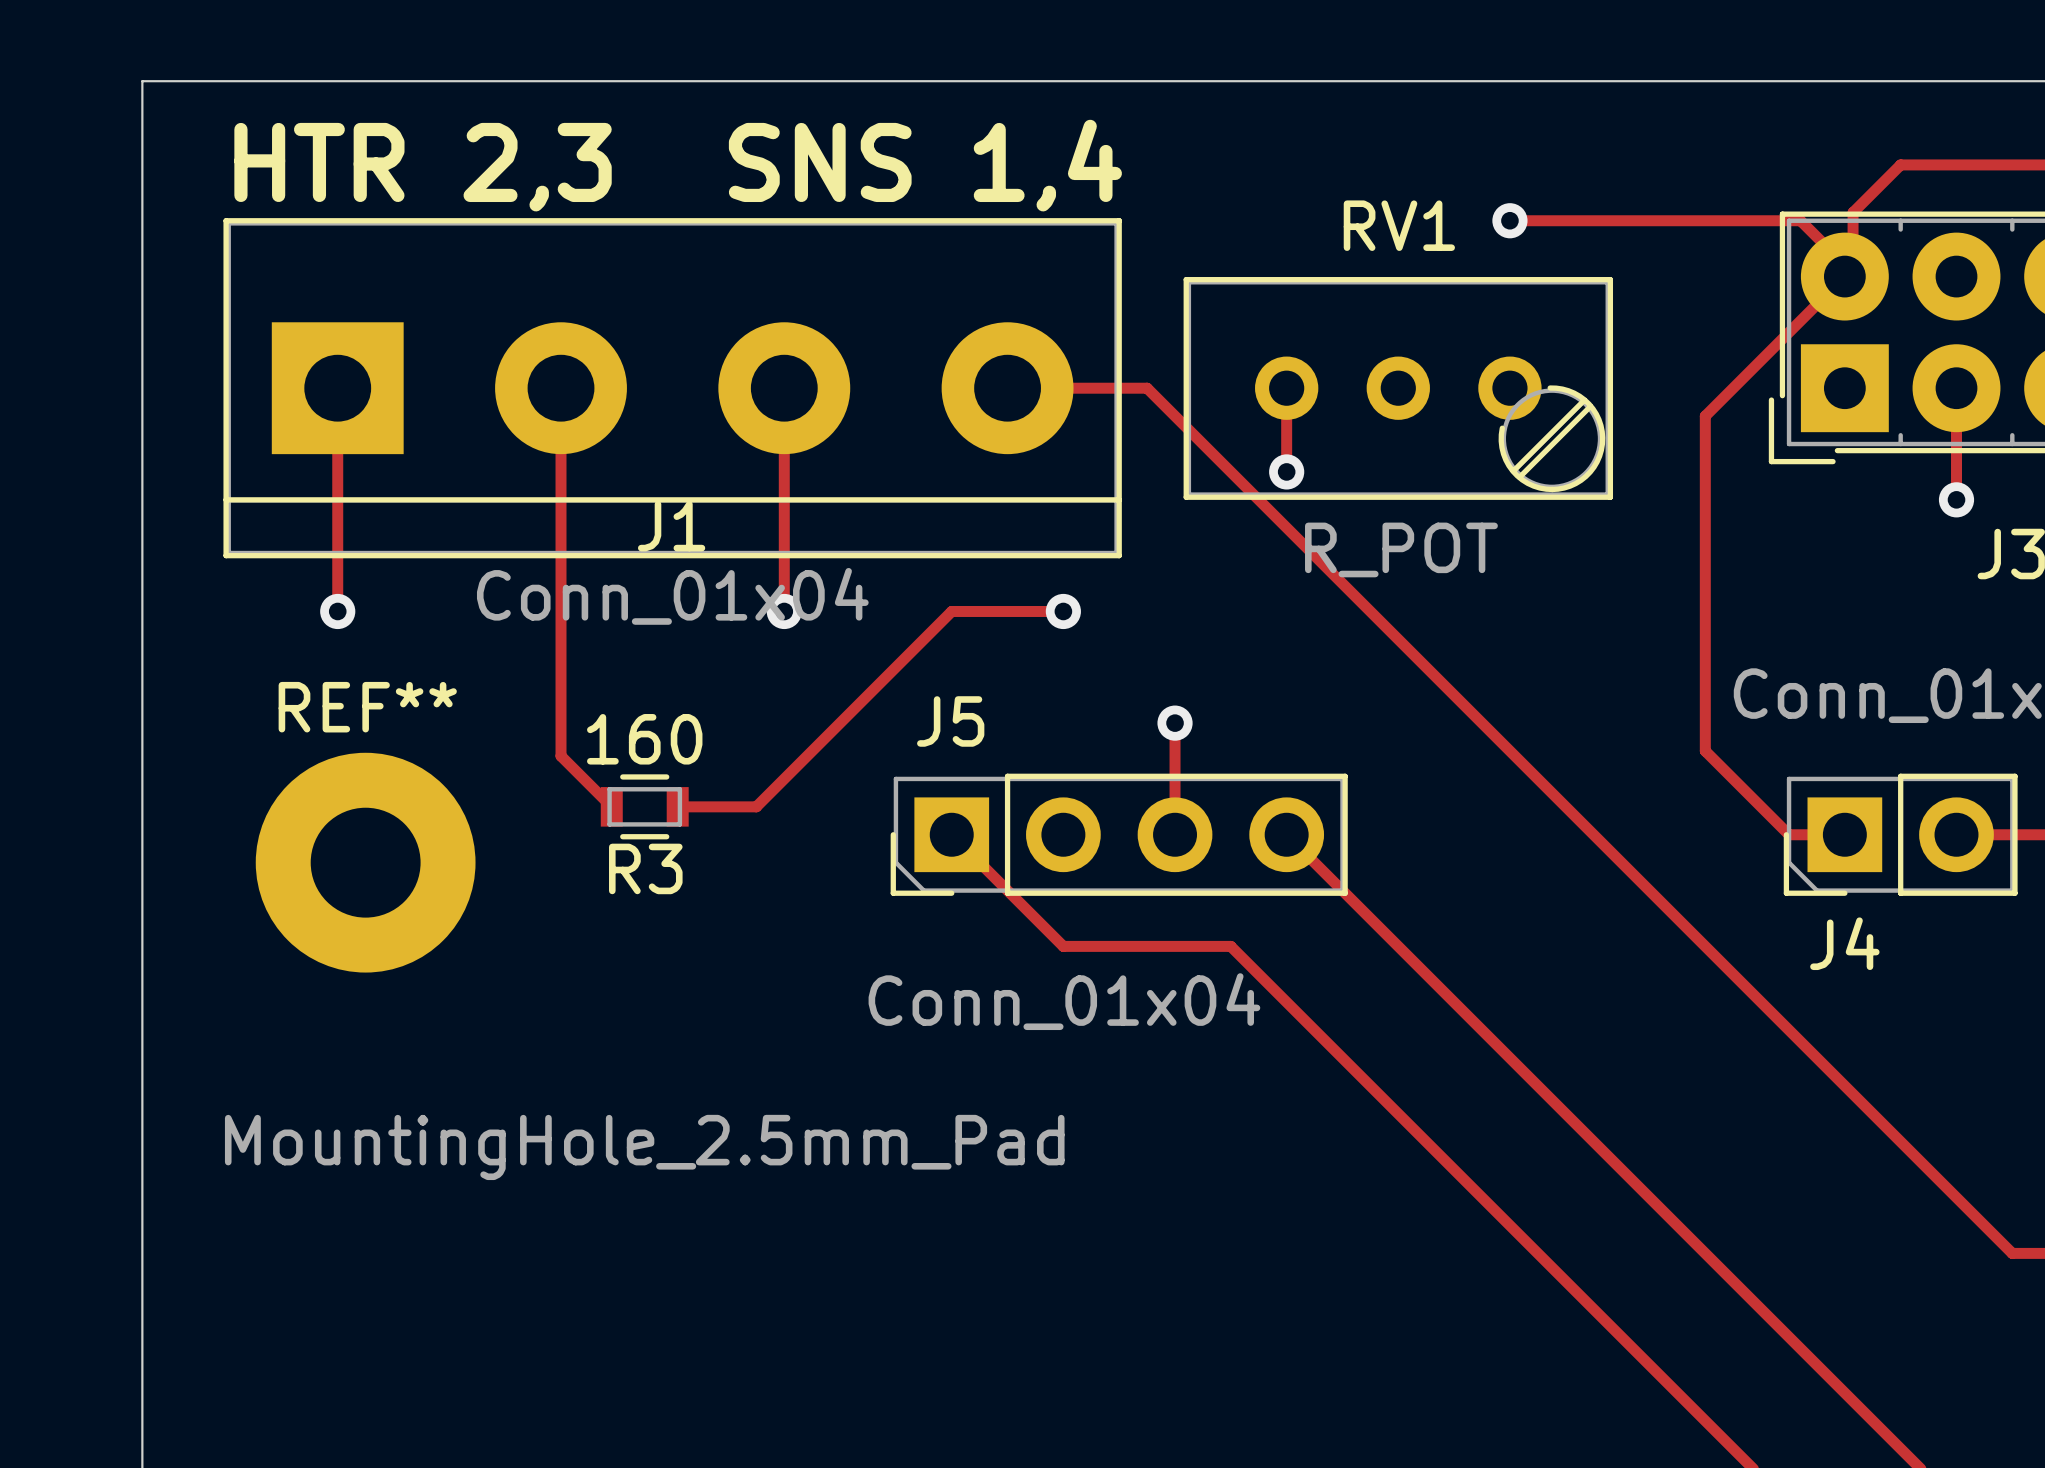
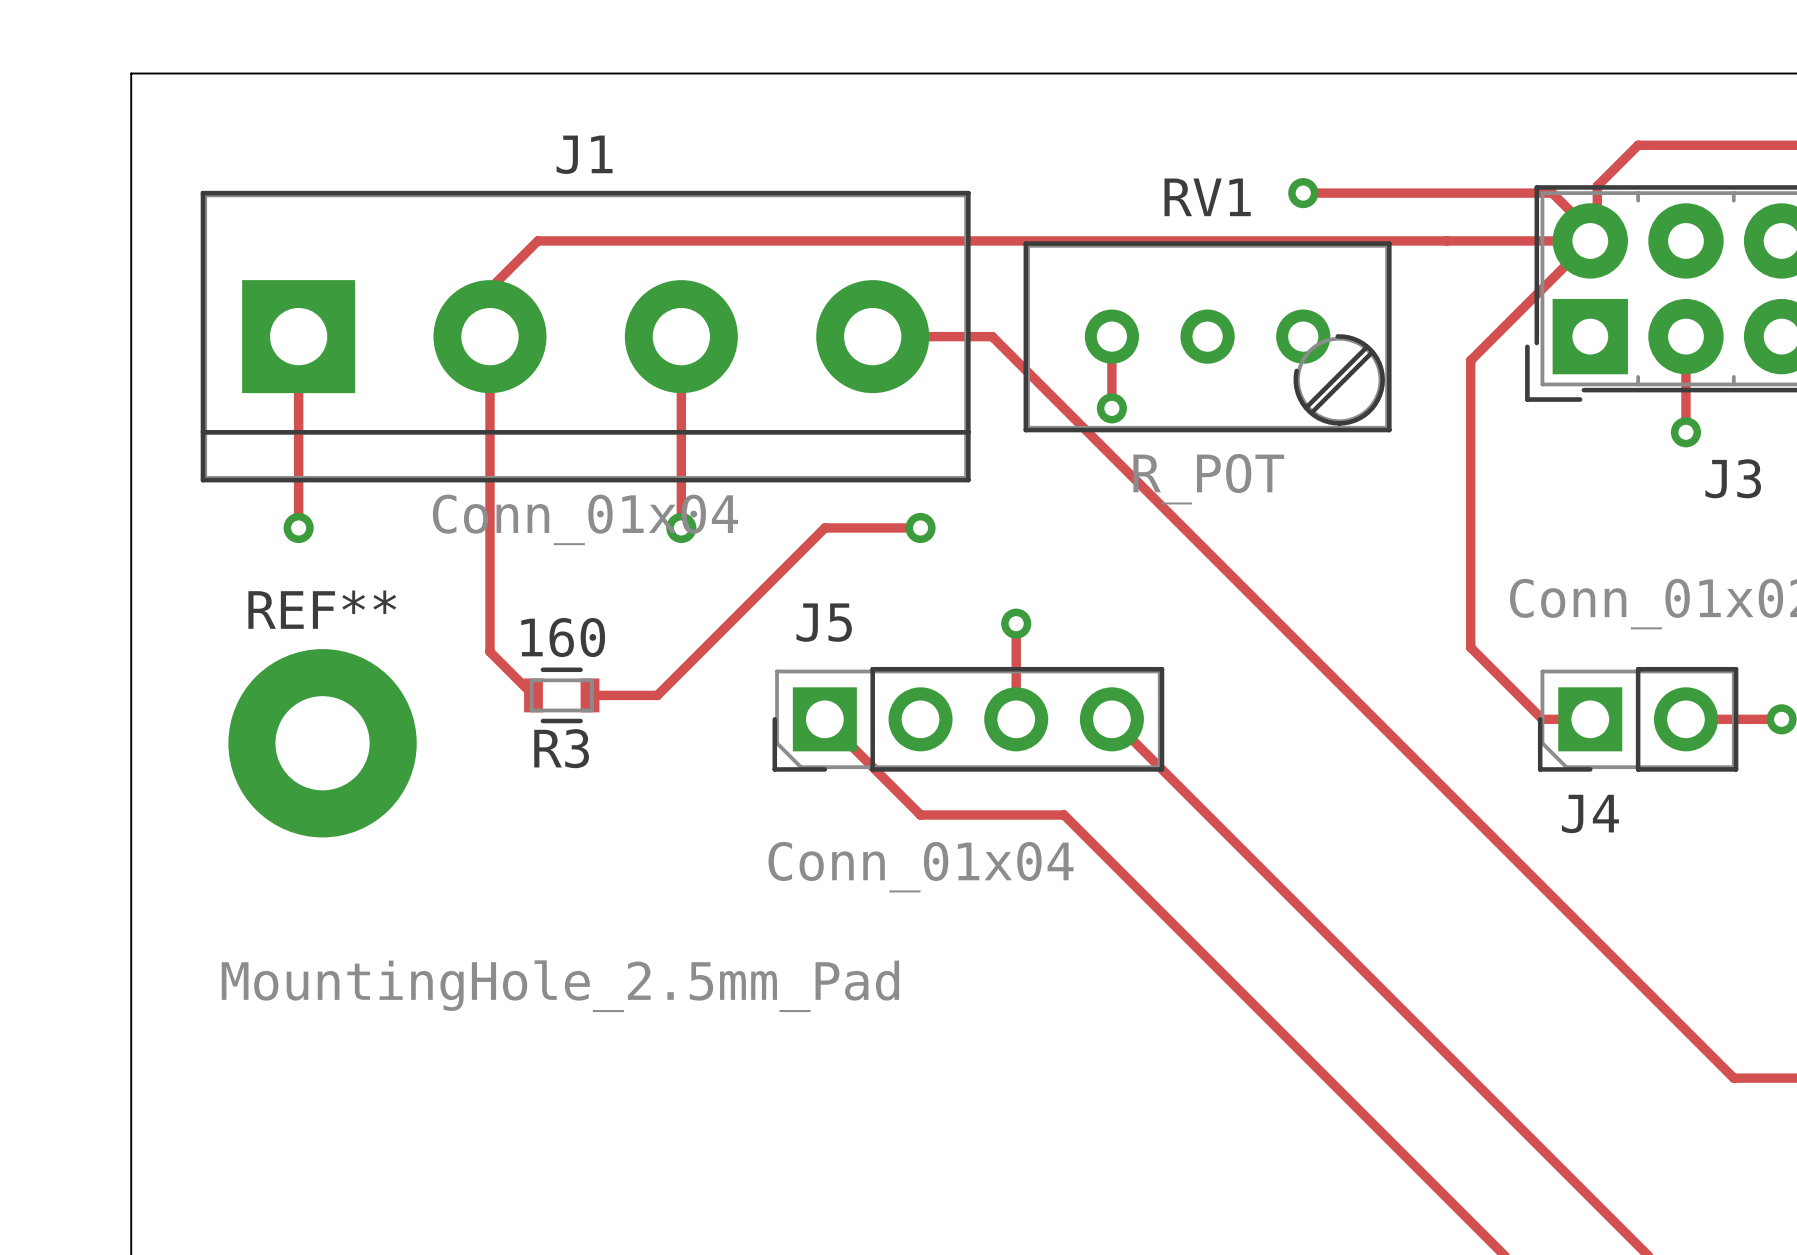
text: SNS 1,4 (925, 165) -> none
text: HTR 2,3 (423, 167) -> none
track: none -> (1590, 240) (537, 240) (489, 288)
J1 name position: J1 (671, 526) -> J1 (584, 154)

